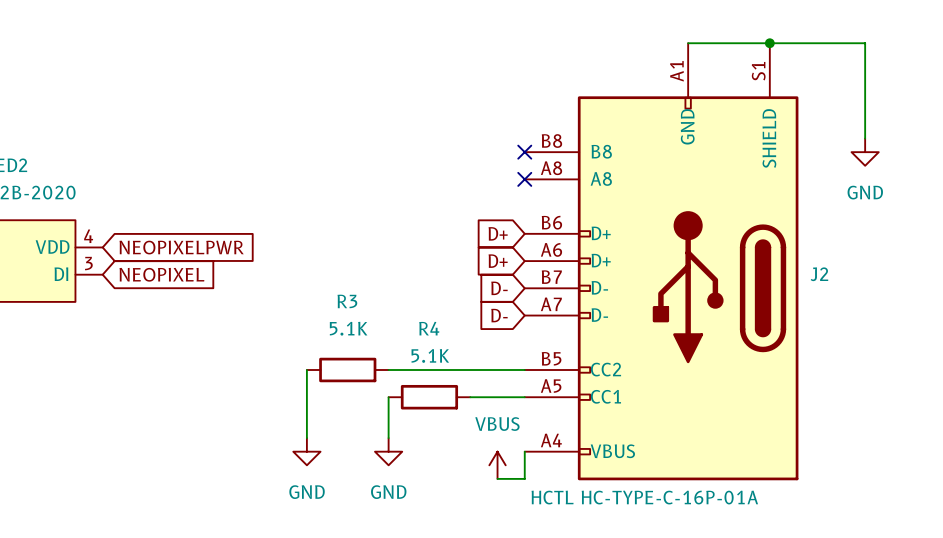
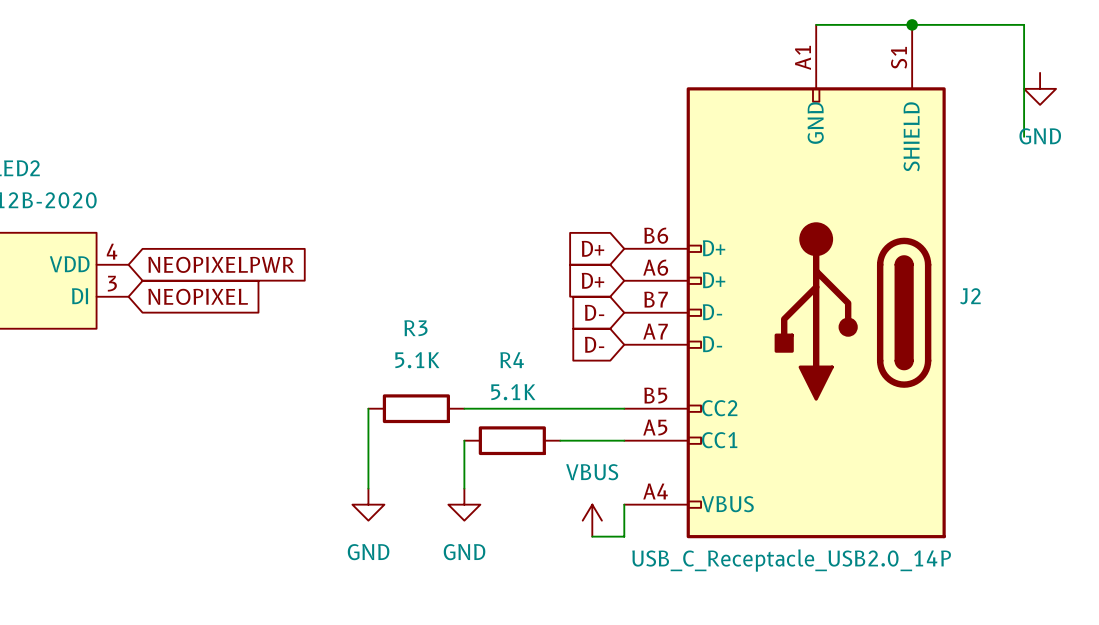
J2 symbol: [524, 43, 799, 481] -> [624, 24, 946, 539]
no-connect mark: (524, 152) -> none
power symbol position: GND (865, 152) -> GND (1040, 88)
no-connect mark: (524, 179) -> none
J2 value: HCTL HC-TYPE-C-16P-01A (644, 497) -> USB_C_Receptacle_USB2.0_14P (791, 560)

